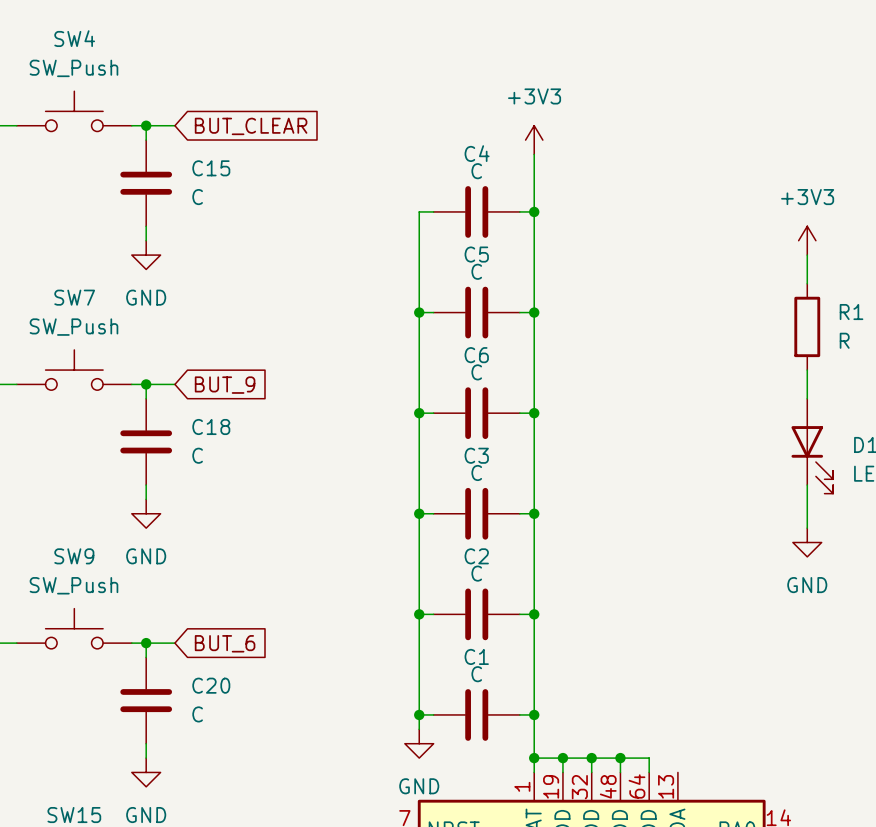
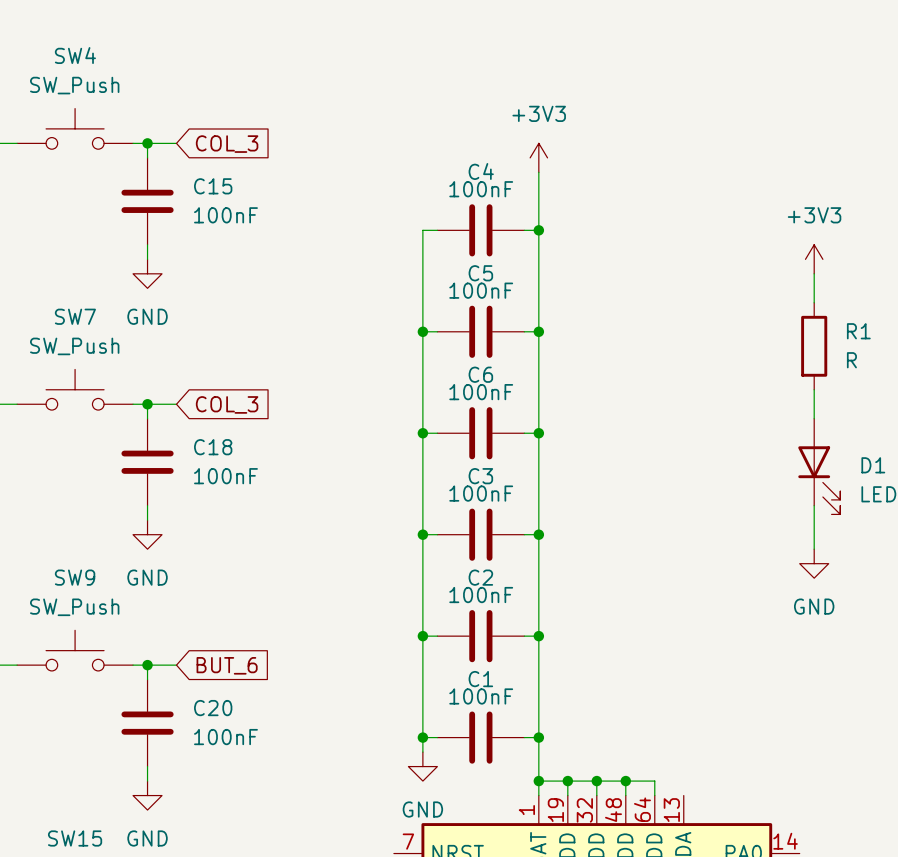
global label: BUT_CLEAR (251, 126) -> COL_3 (227, 144)
C4 value: C (476, 171) -> 100nF (481, 189)
C15 value: C (197, 197) -> 100nF (225, 215)
C5 value: C (476, 271) -> 100nF (481, 290)
C6 value: C (476, 372) -> 100nF (481, 392)
global label: BUT_9 (225, 385) -> COL_3 (227, 404)
C18 value: C (197, 455) -> 100nF (225, 476)
C3 value: C (476, 472) -> 100nF (481, 493)
C2 value: C (476, 573) -> 100nF (481, 595)
C1 value: C (476, 674) -> 100nF (481, 696)
C20 value: C (197, 714) -> 100nF (225, 737)

